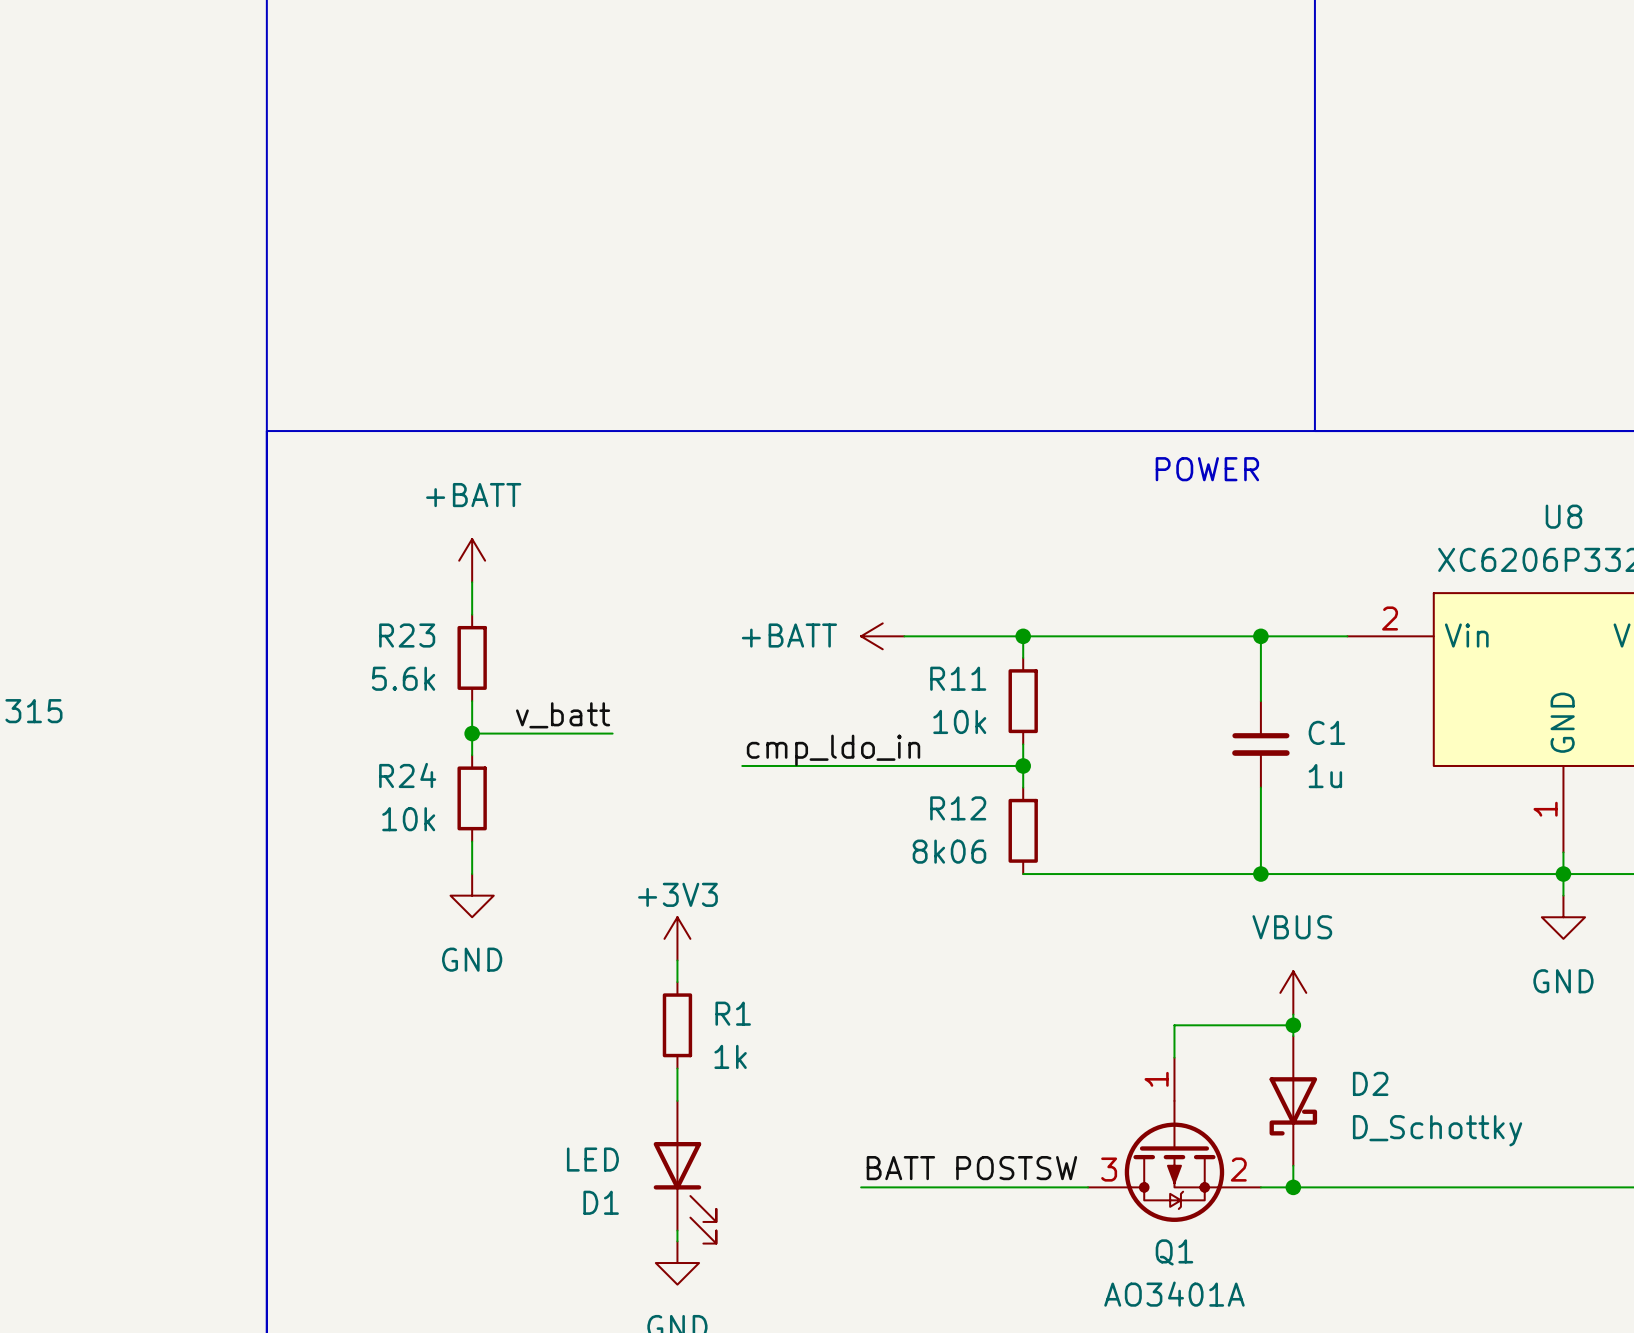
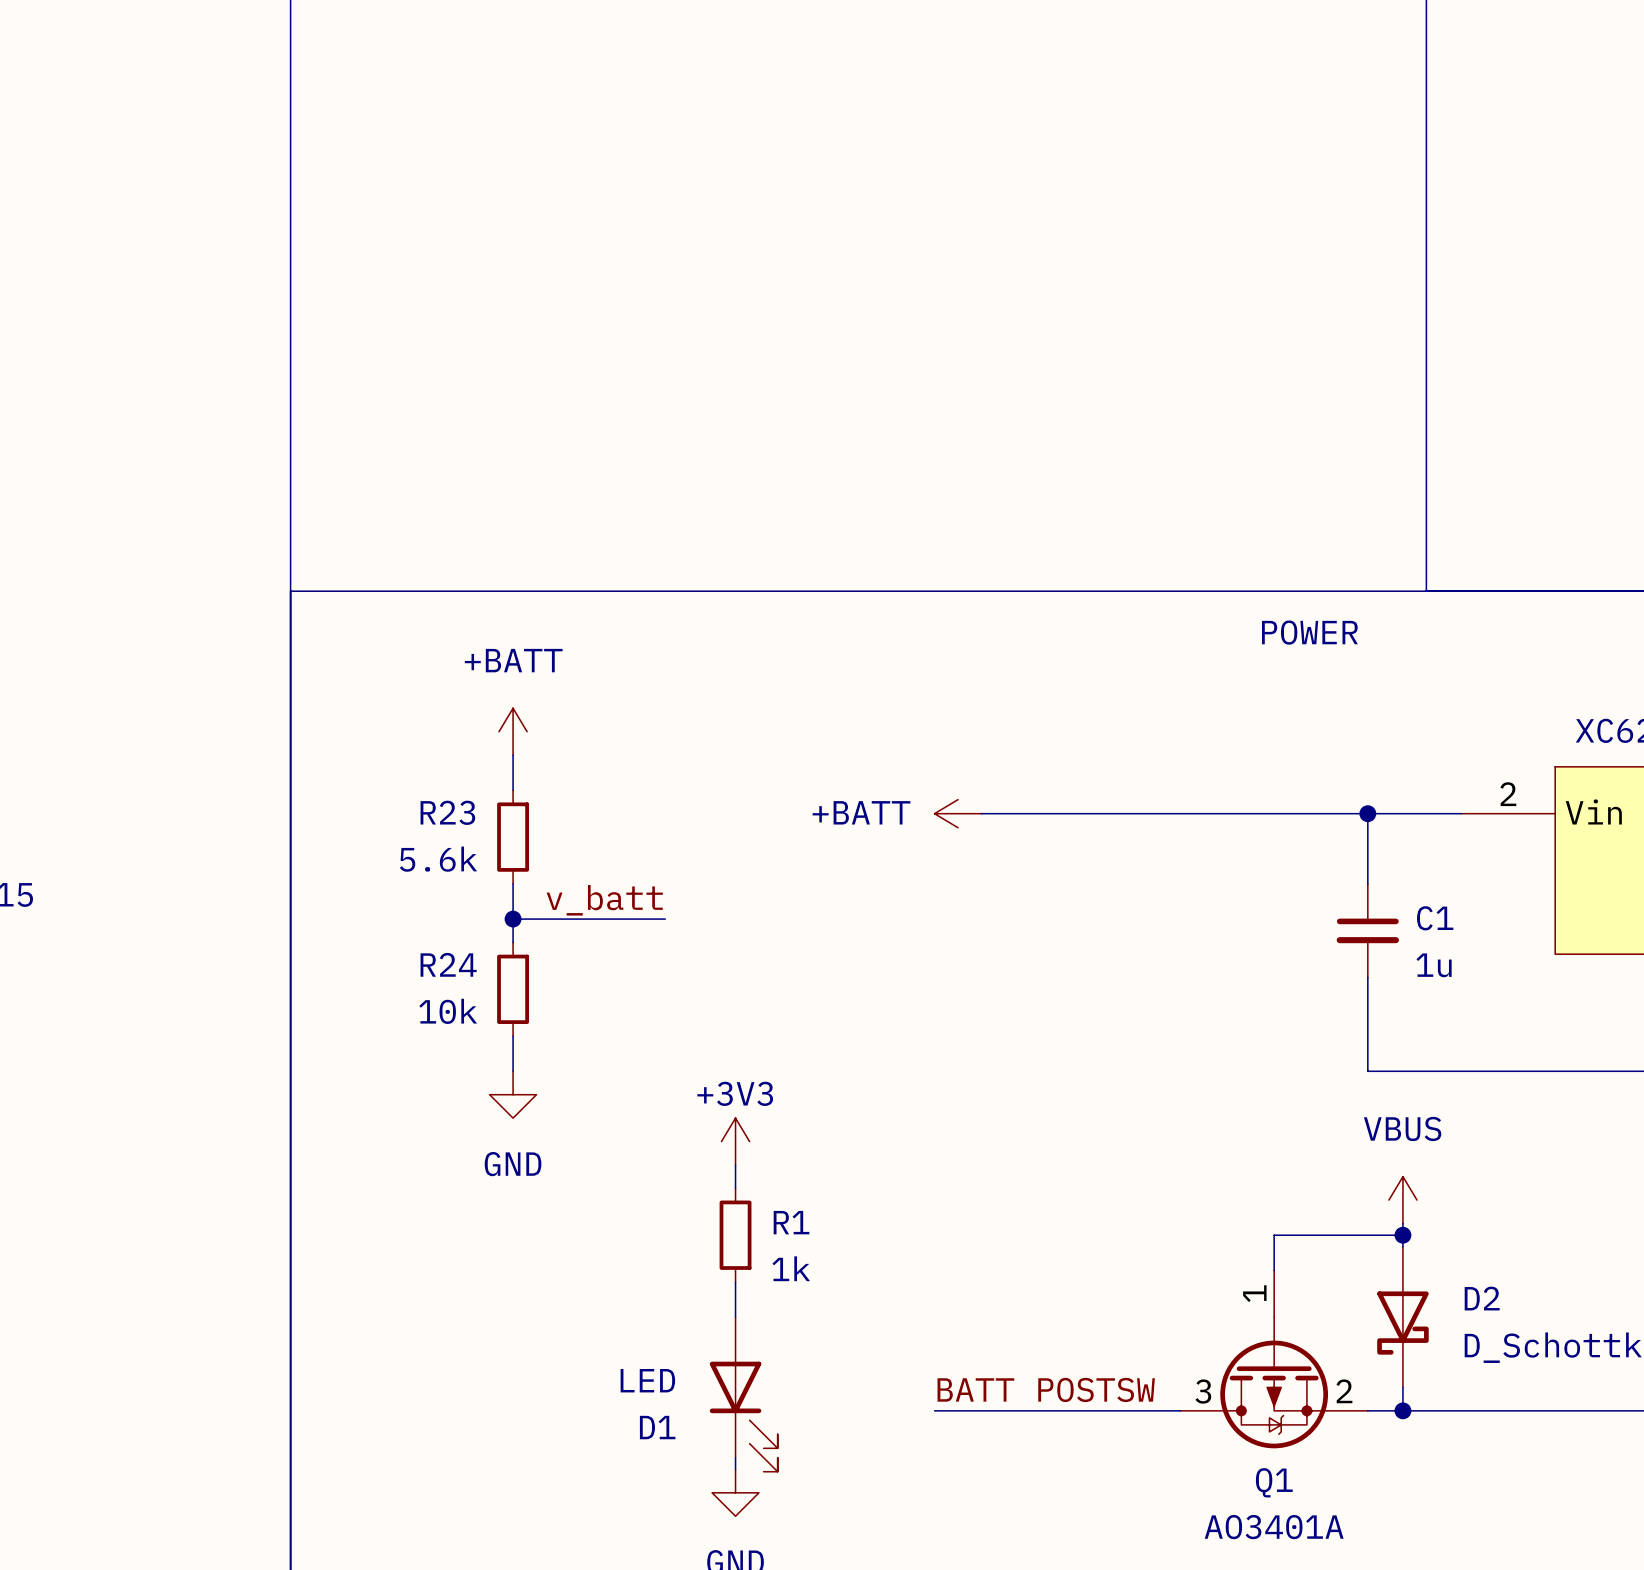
wire: (1023, 636) (1023, 657) -> none
junction: (1023, 636) -> none
R11: 10k (1023, 701) -> none
wire: (1023, 744) (1023, 787) -> none
label: cmp_ldo_in (833, 750) -> none
wire: (742, 765) (1023, 765) -> none
junction: (1023, 765) -> none
R12: 8k06 (1023, 830) -> none
wire: (1023, 874) (1260, 874) -> none
junction: (1260, 874) -> none

